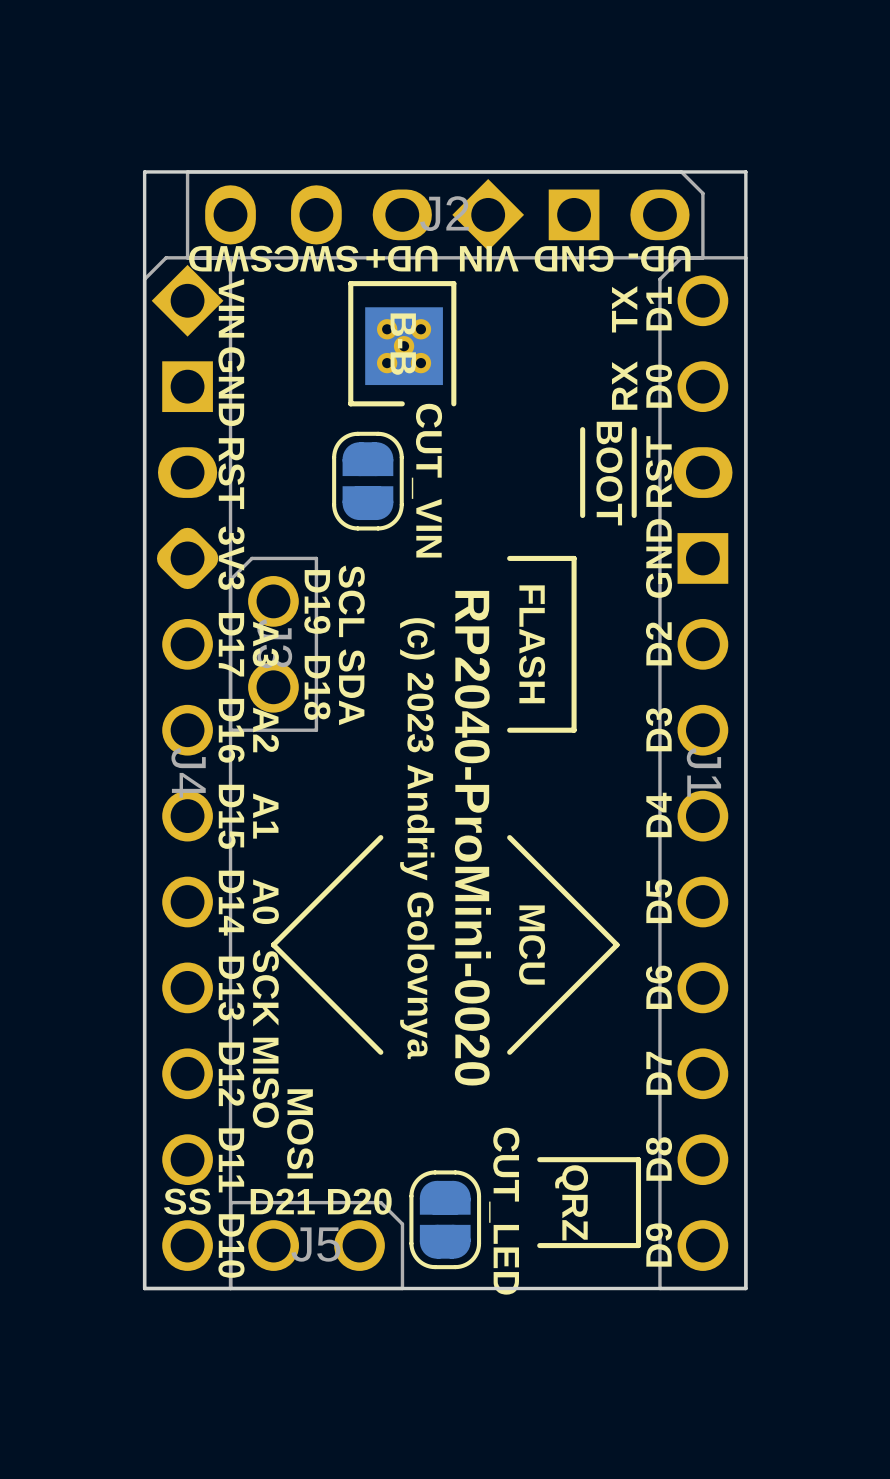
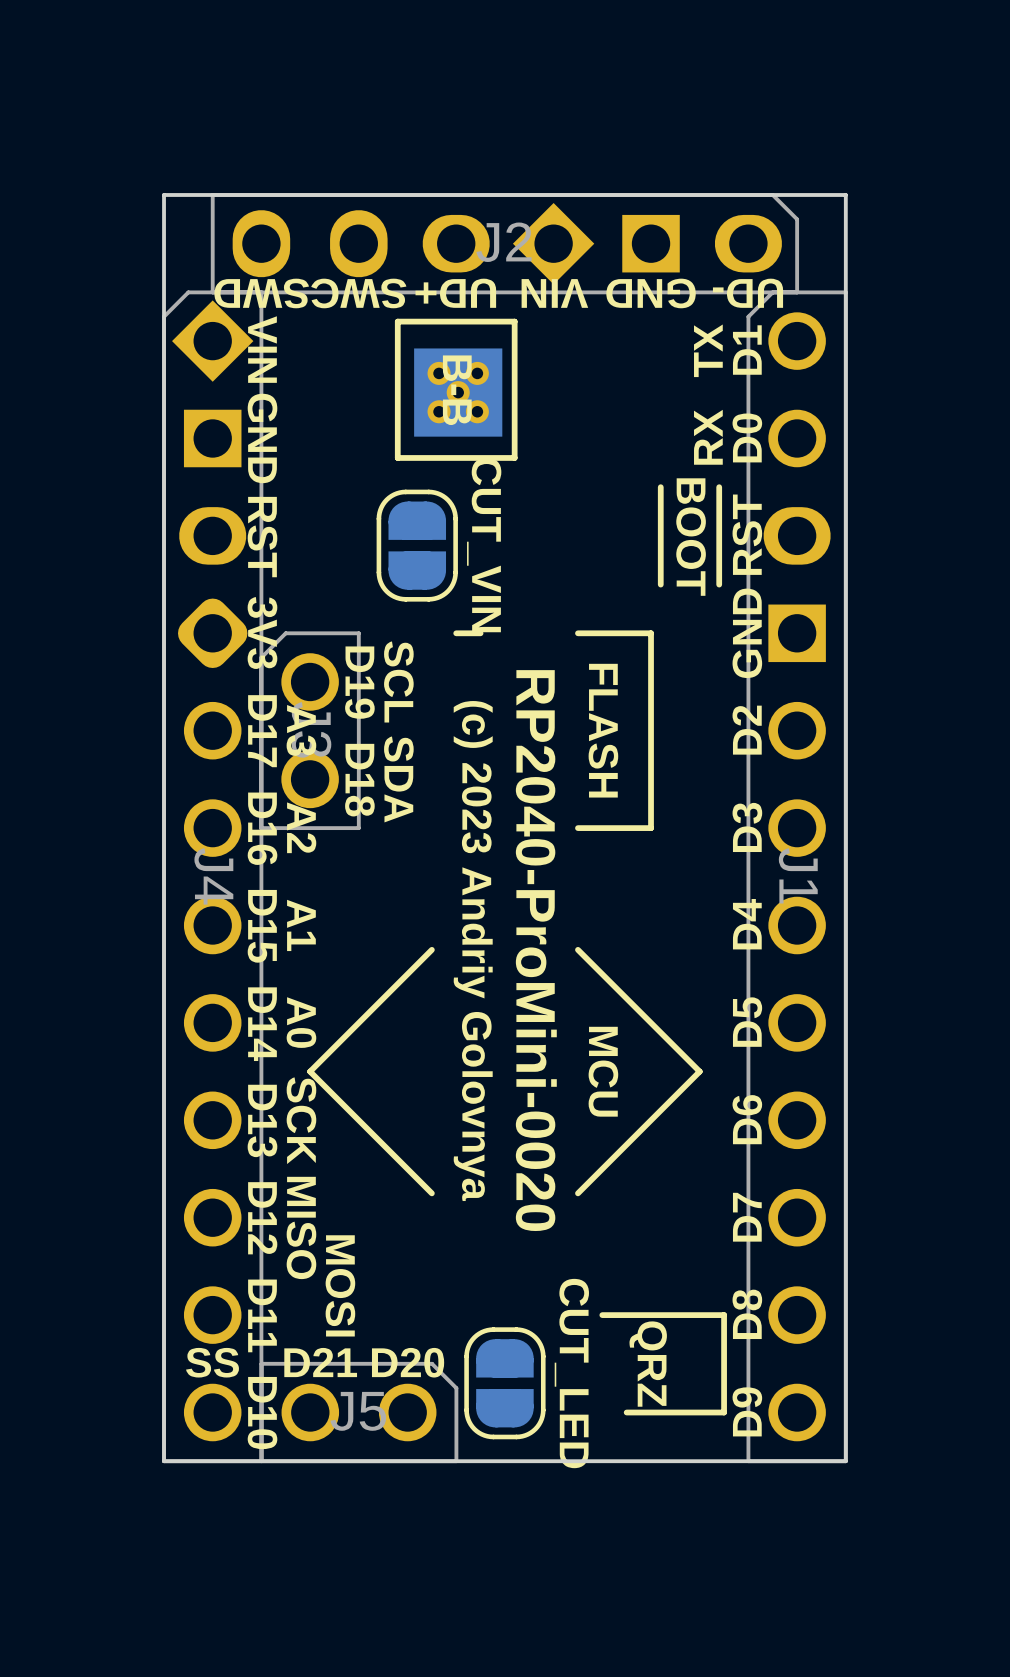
line: none -> (514, 457) (456, 457)
line: none -> (480, 633) (456, 633)
line: none -> (612, 1315) (602, 1315)
line: (552, 1245) (539, 1245) -> none

